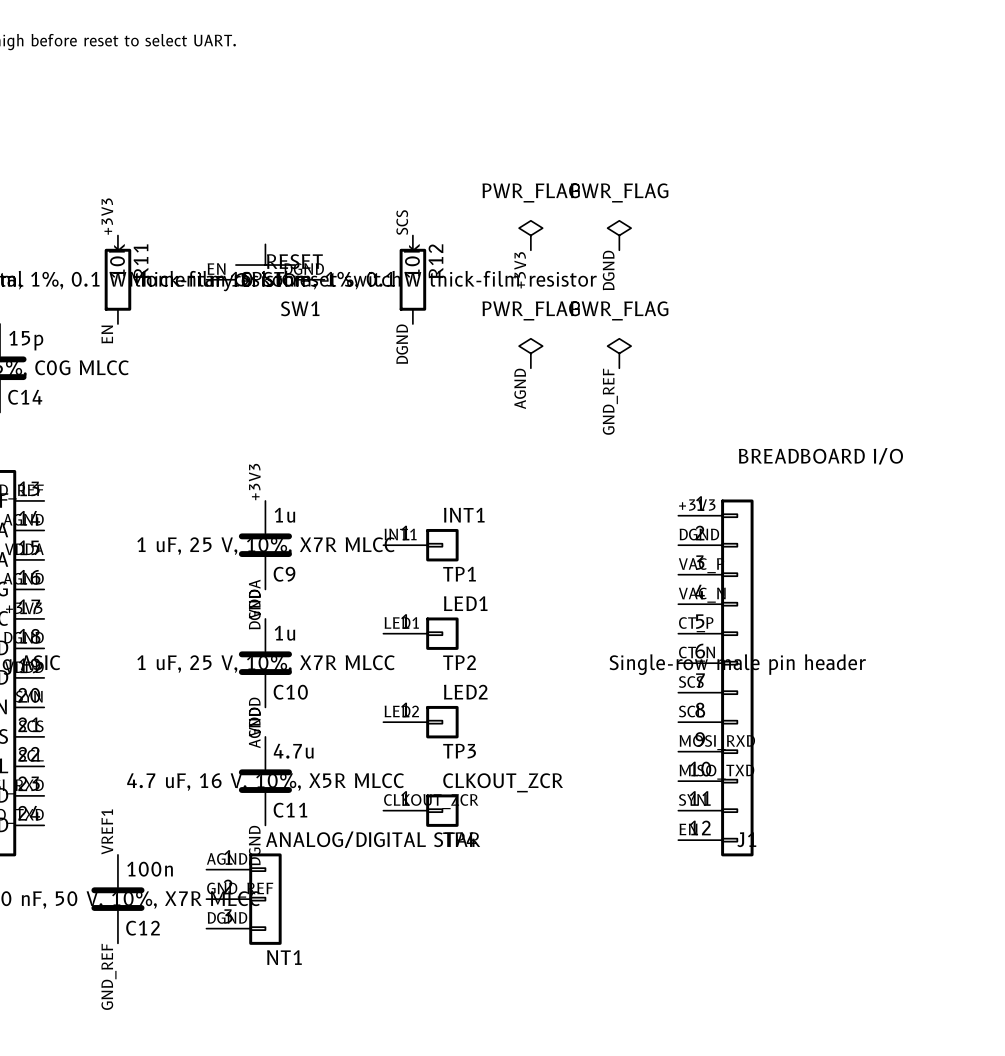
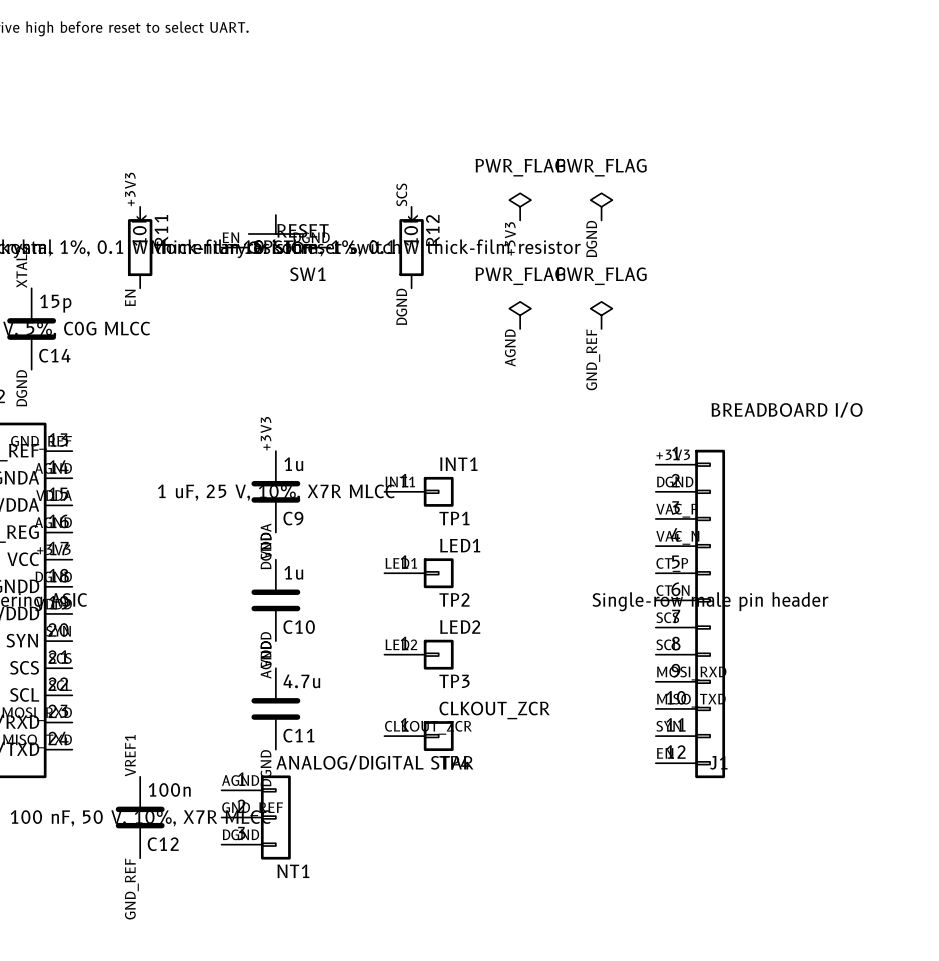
C10 text: 1 uF, 25 V, 10%, X7R MLCC (266, 664) -> none
C11 text: 4.7 uF, 16 V, 10%, X5R MLCC (265, 782) -> none

